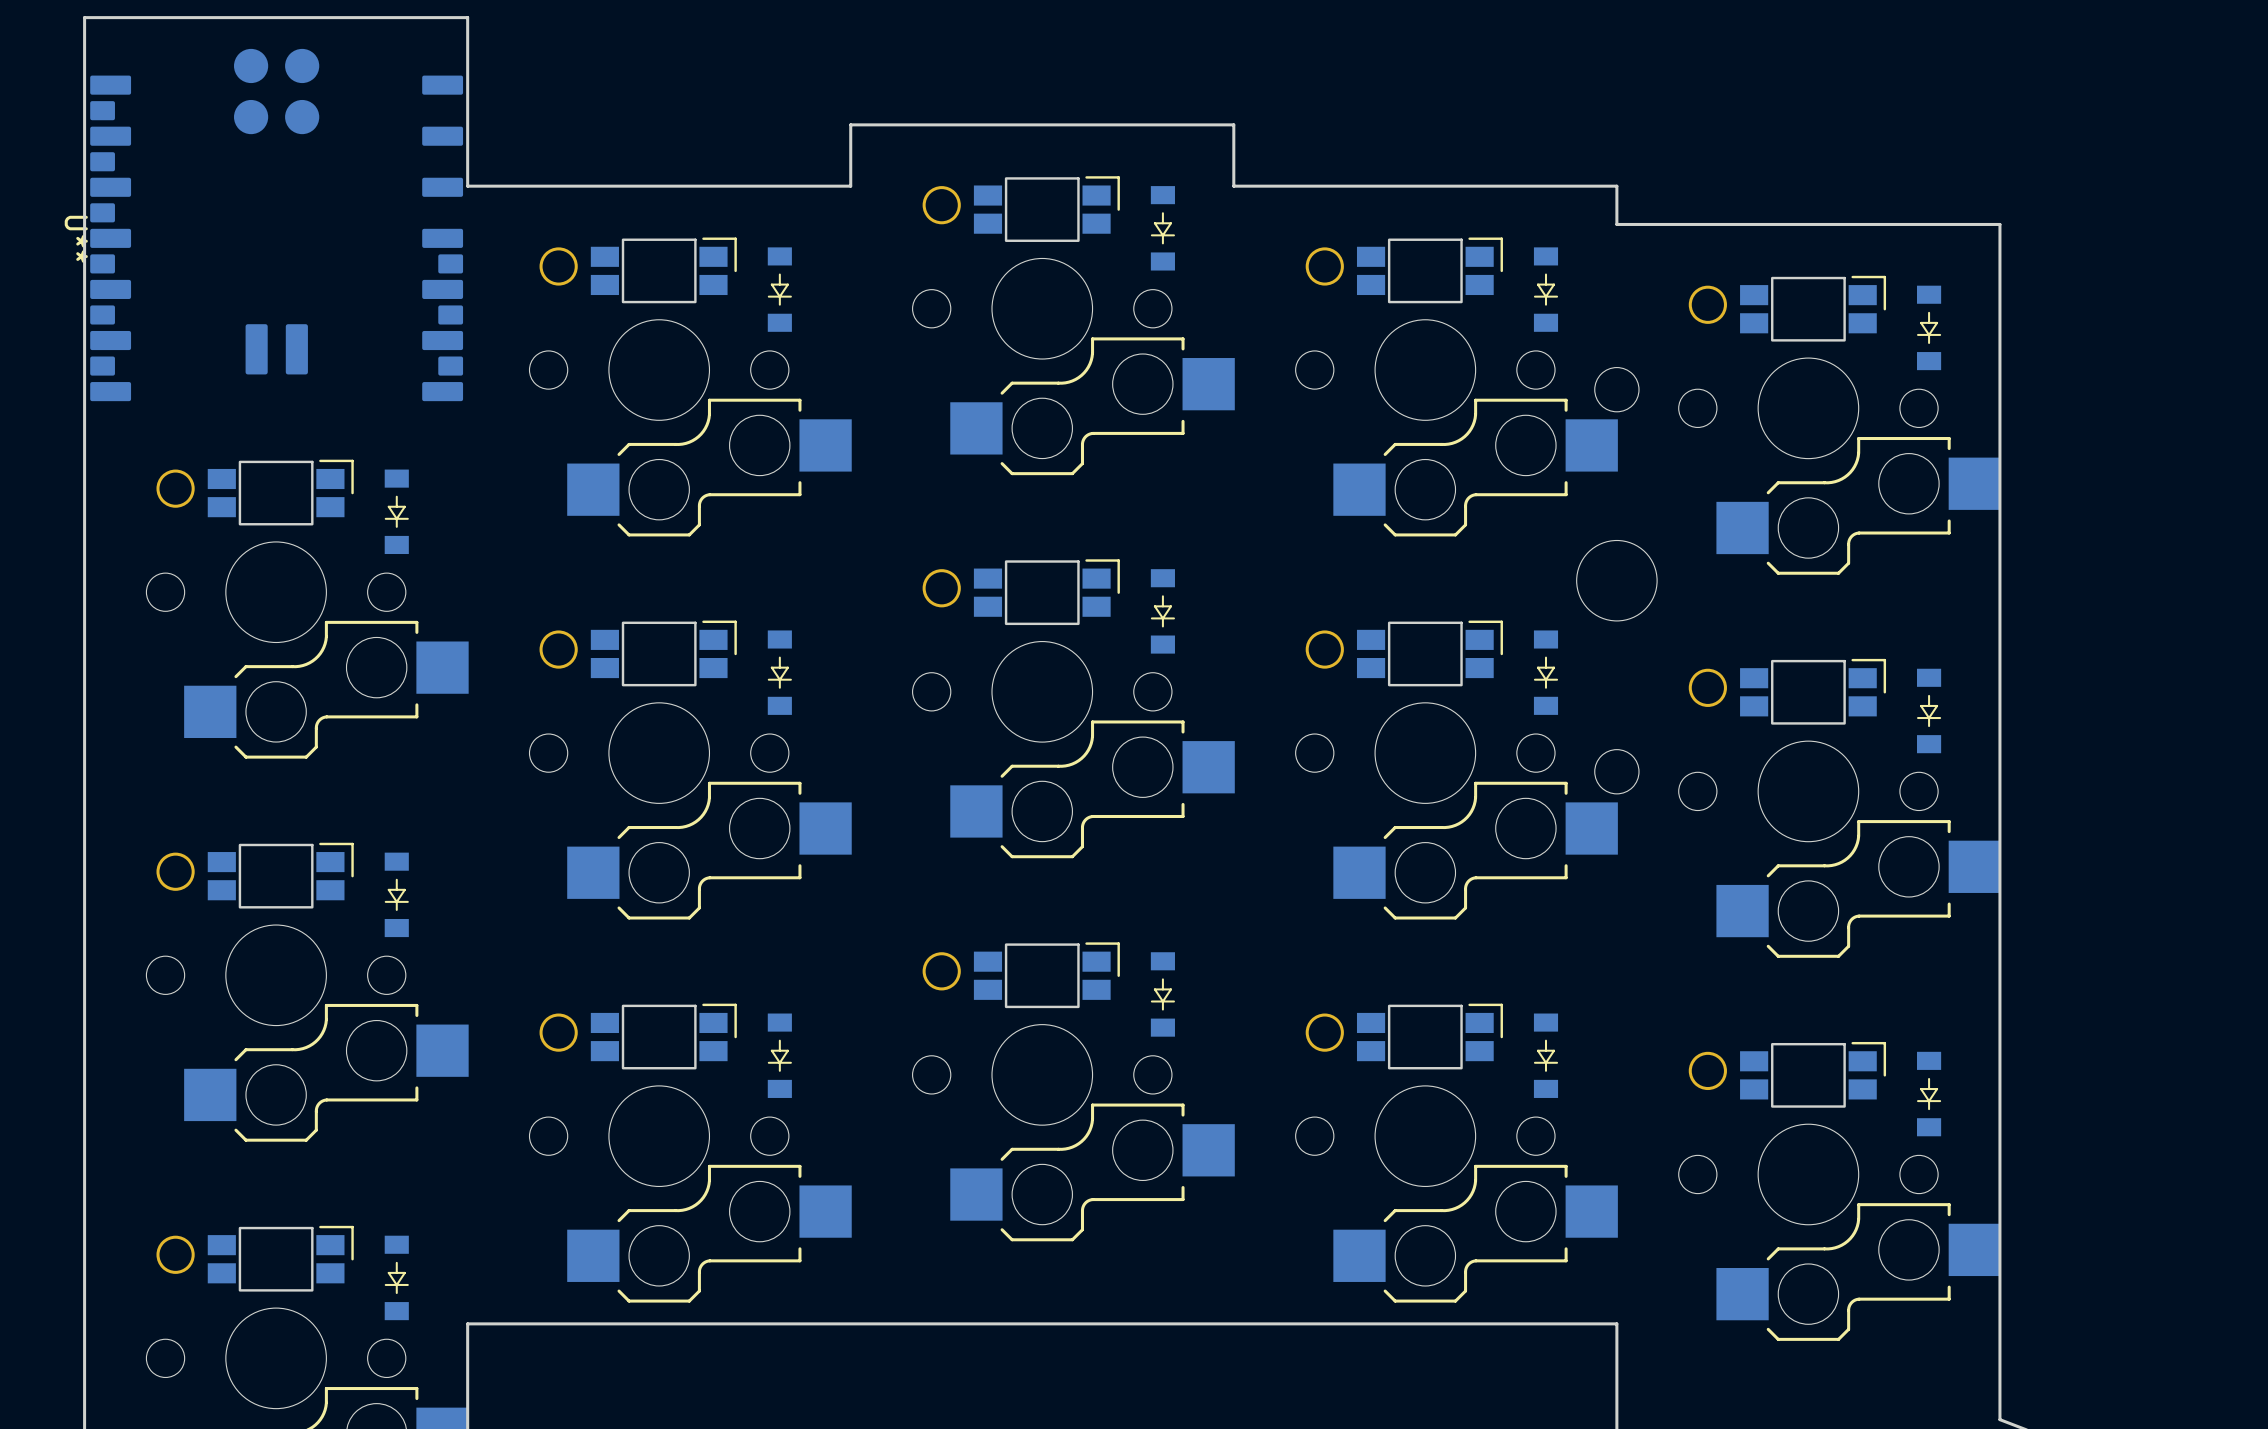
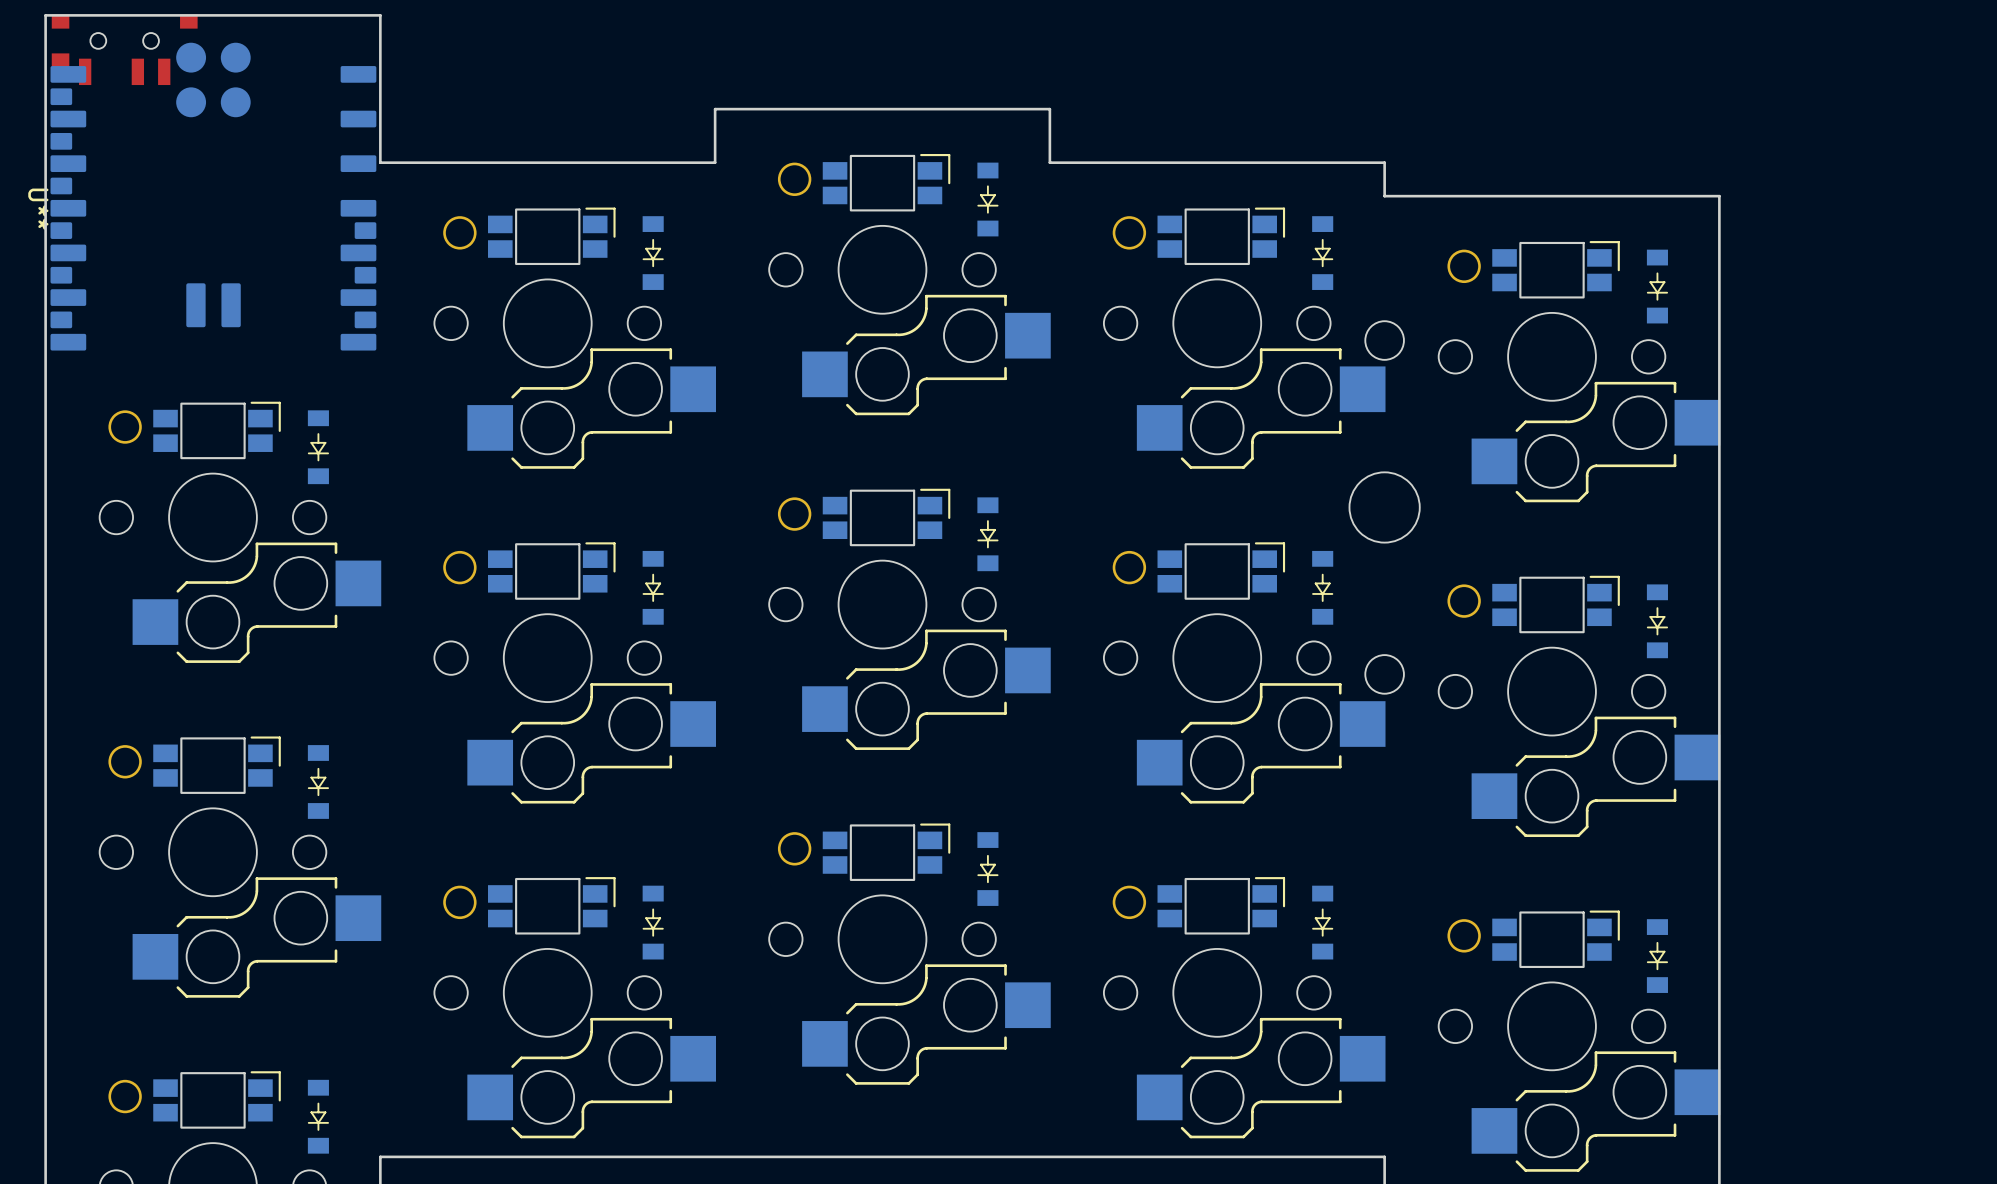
part: none -> (124, 49)

